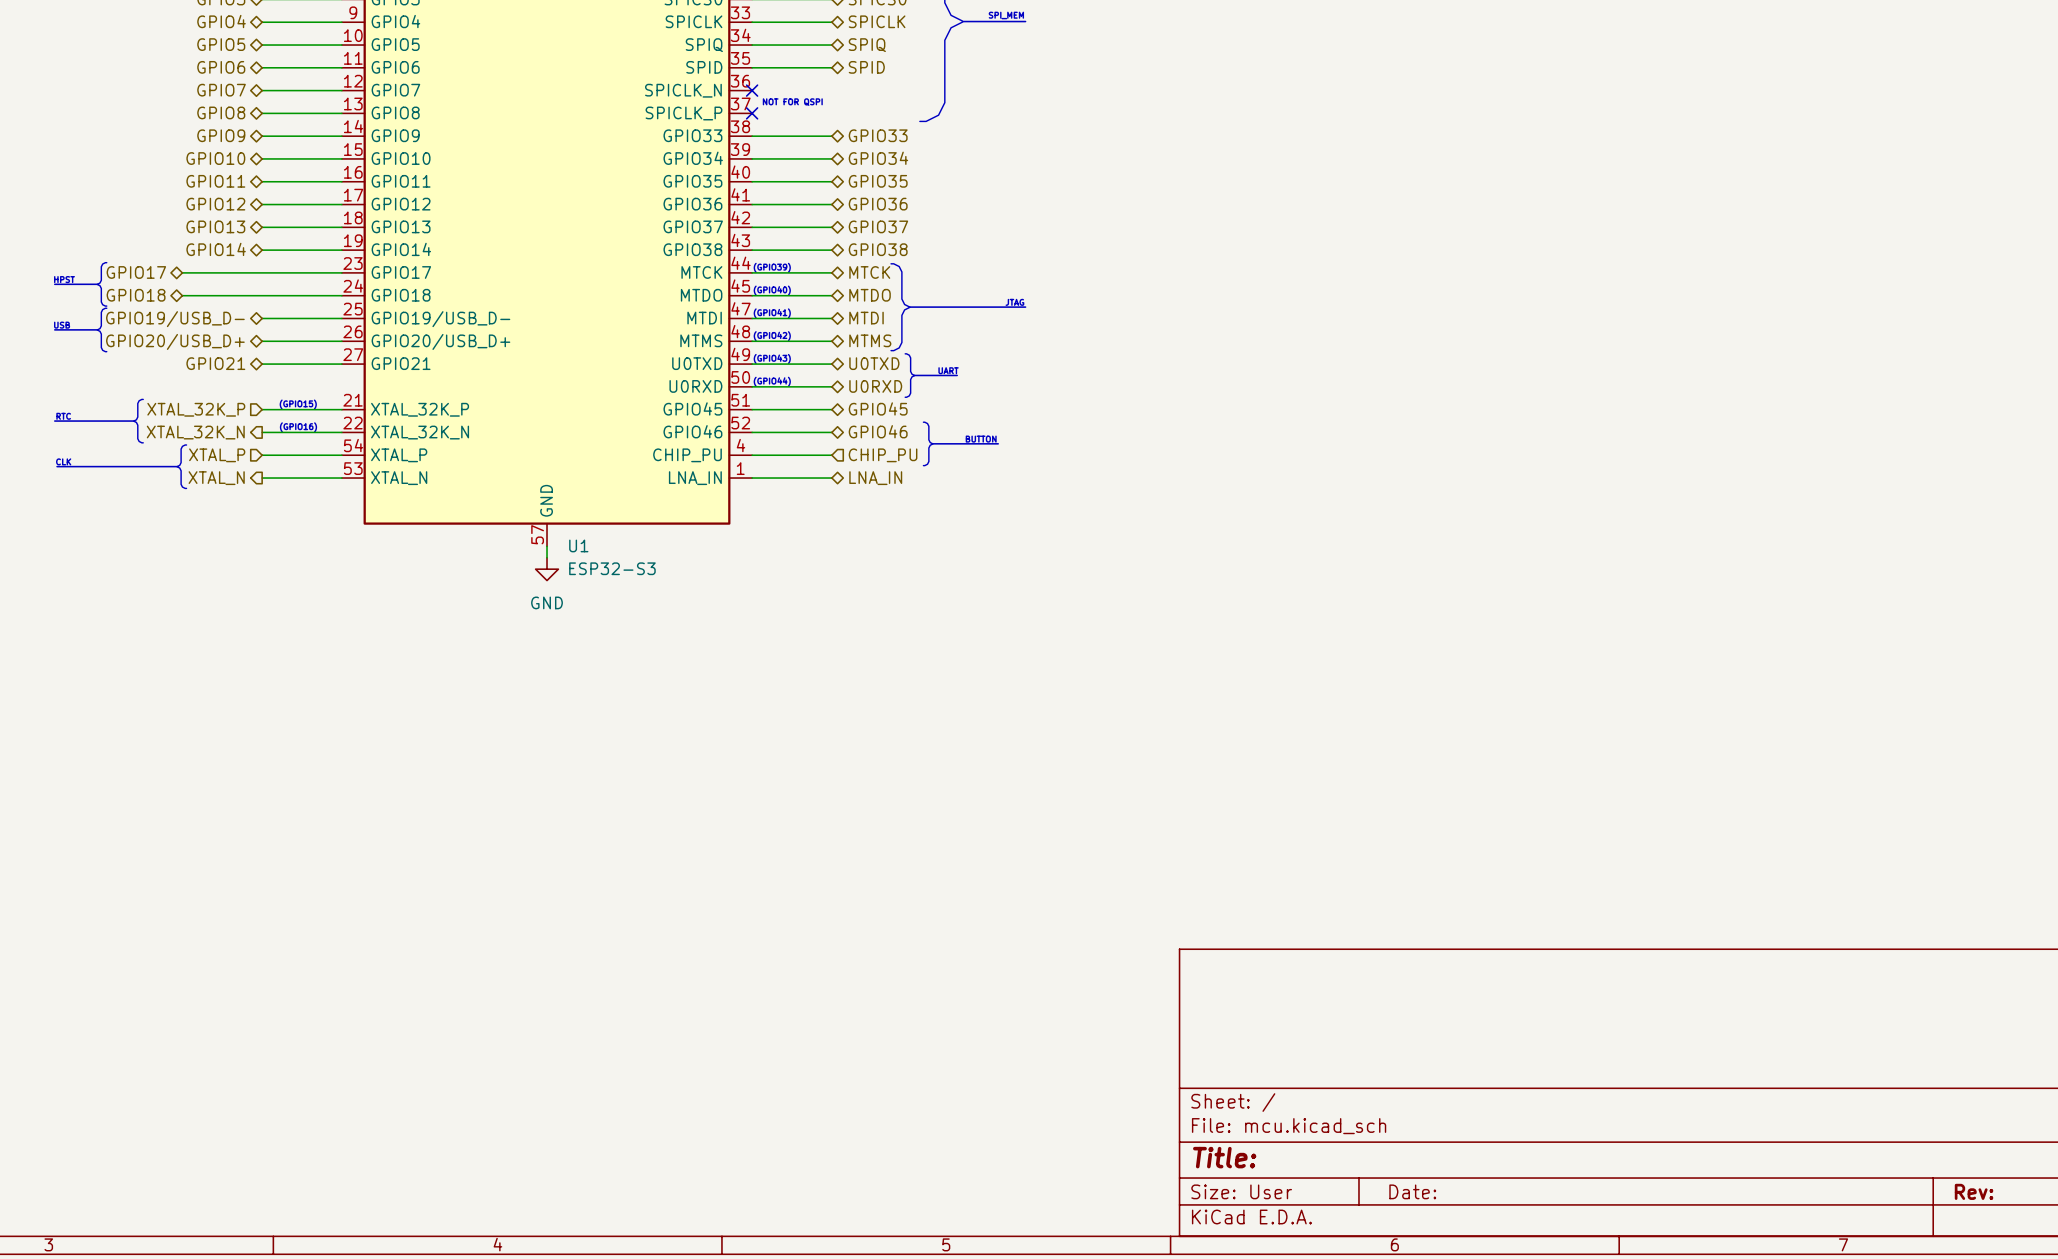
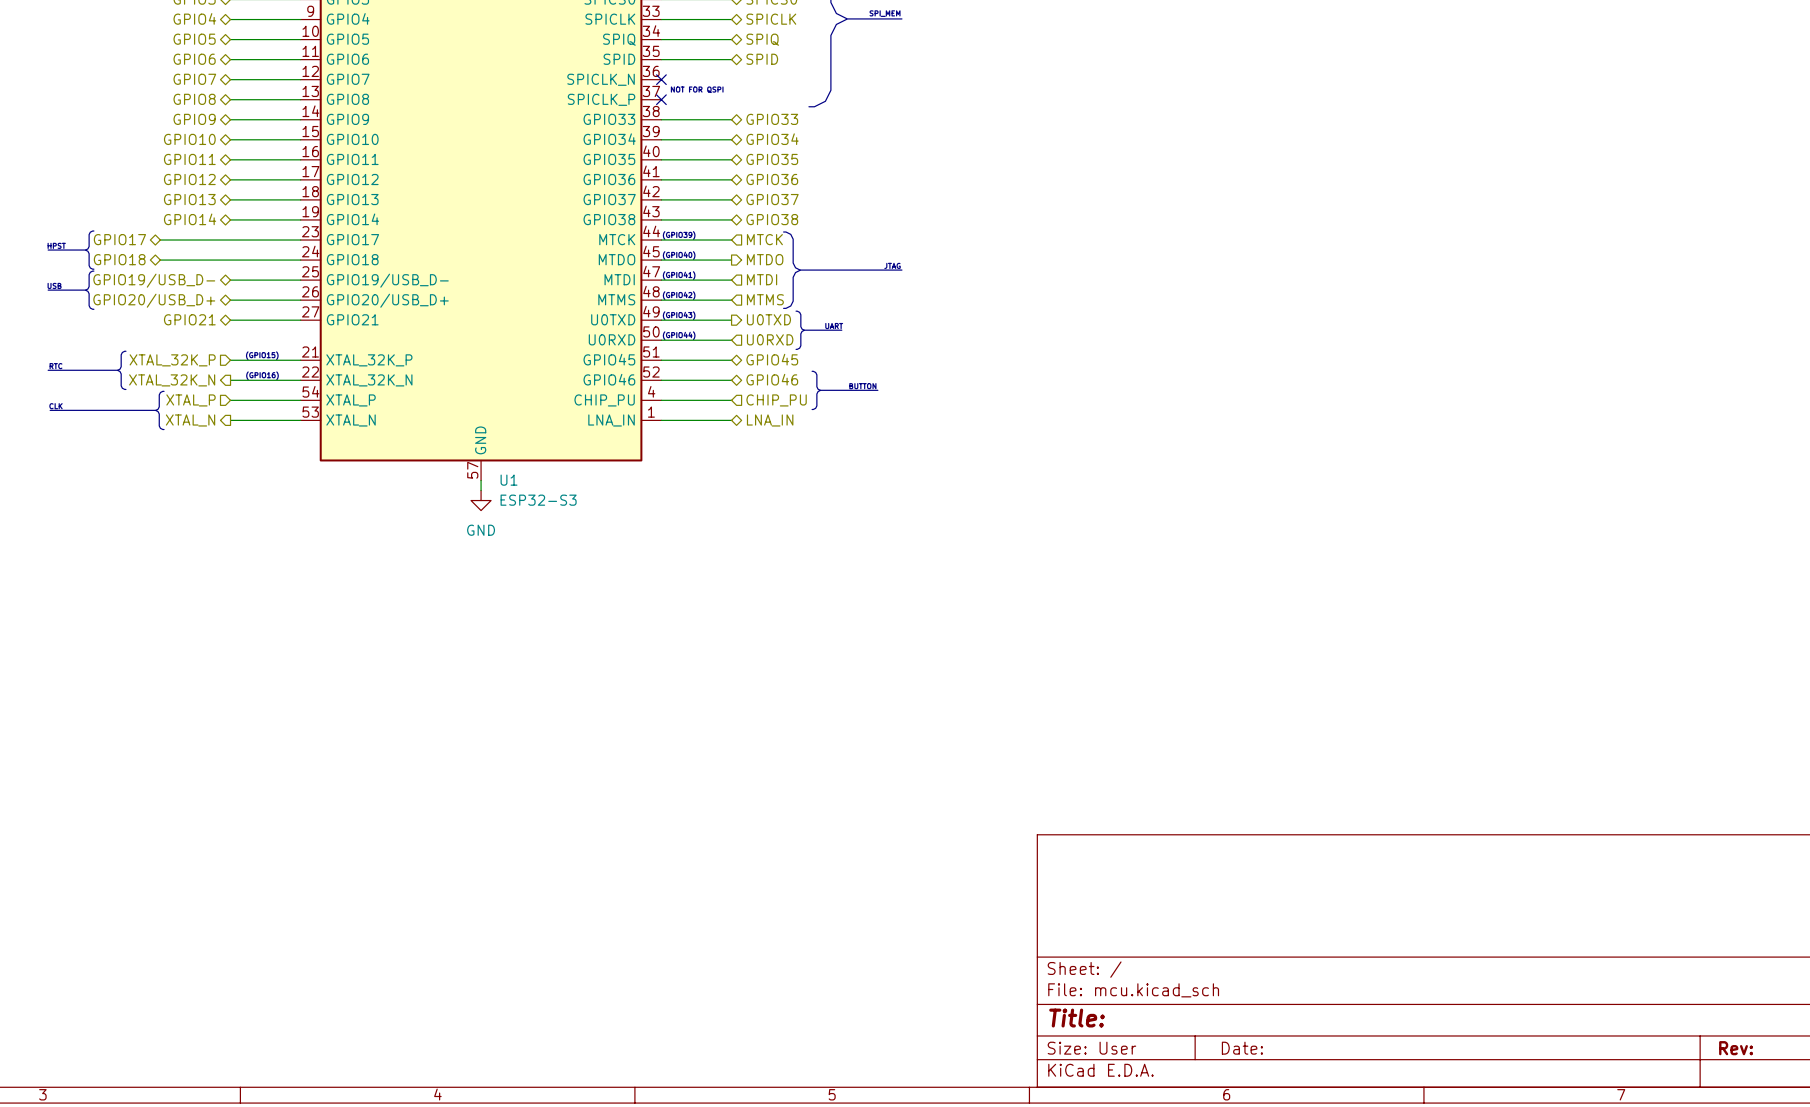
hierarchical label shape: bidirectional (869, 272) -> input (764, 239)
hierarchical label shape: bidirectional (870, 295) -> output (765, 259)
hierarchical label shape: bidirectional (866, 318) -> input (762, 279)
hierarchical label shape: bidirectional (870, 340) -> input (765, 299)
hierarchical label shape: bidirectional (874, 363) -> output (768, 319)
hierarchical label shape: bidirectional (875, 386) -> input (770, 339)

